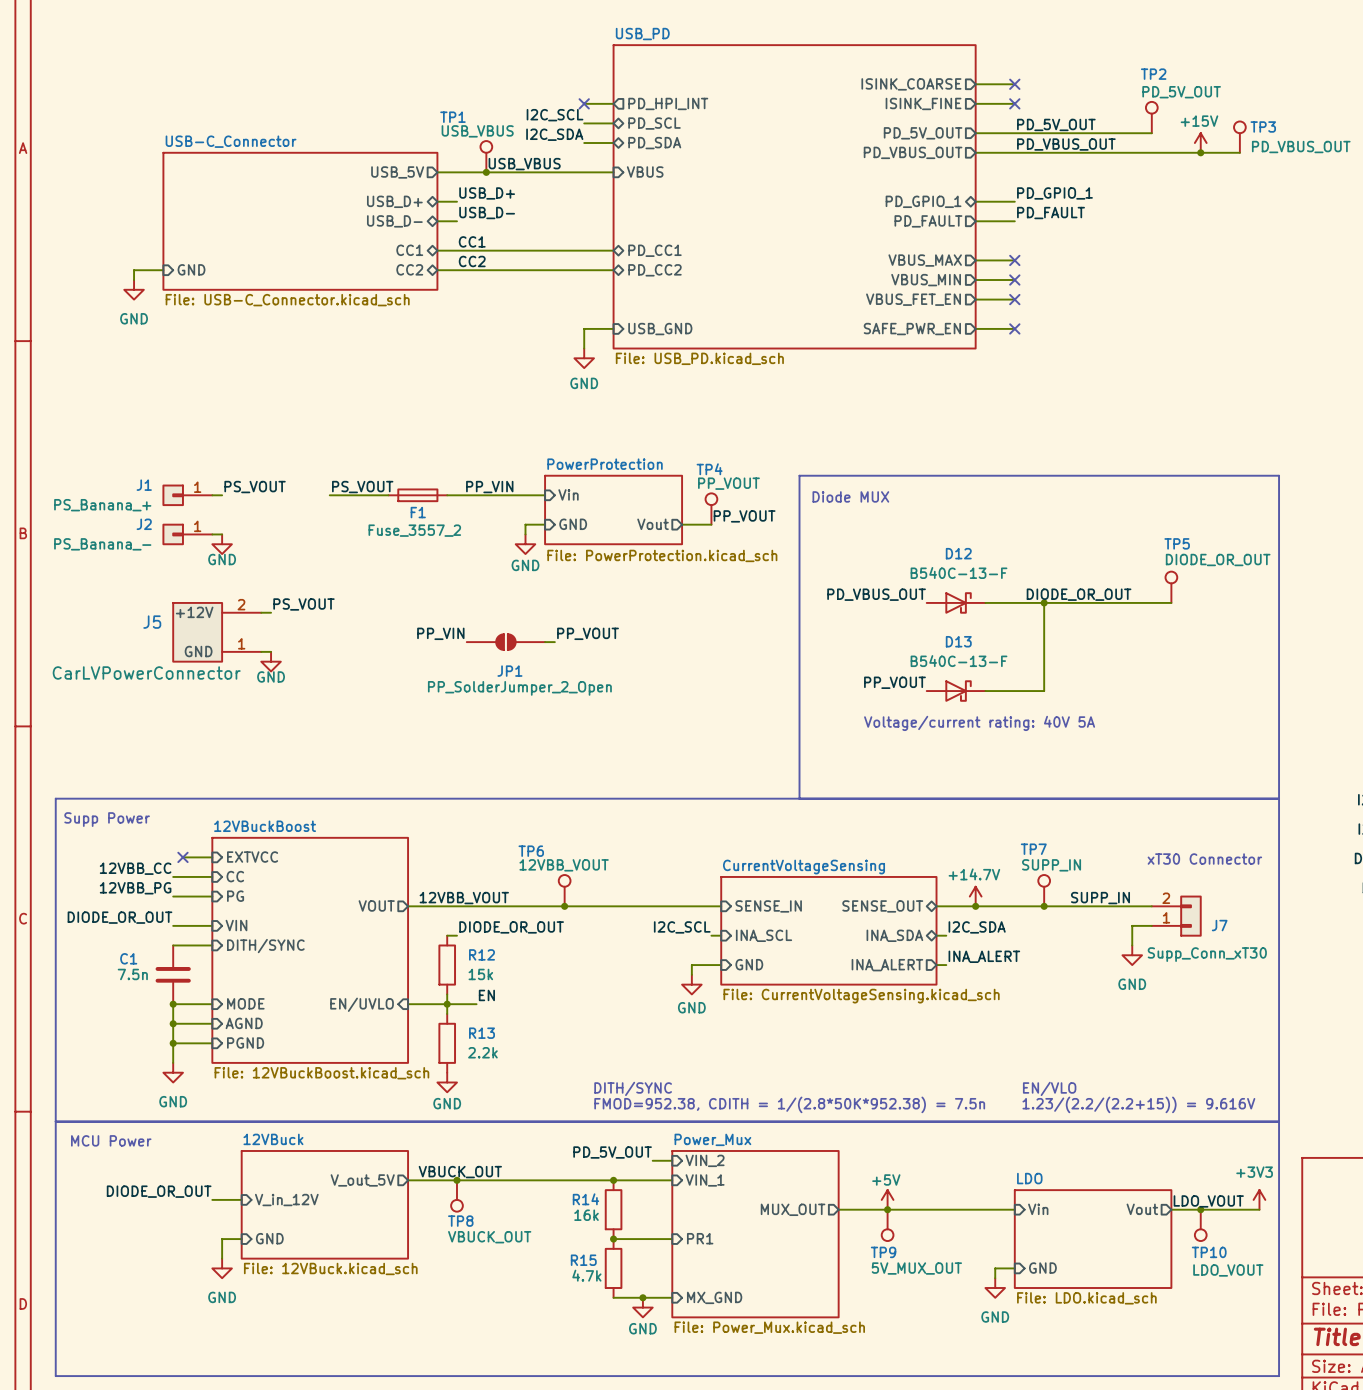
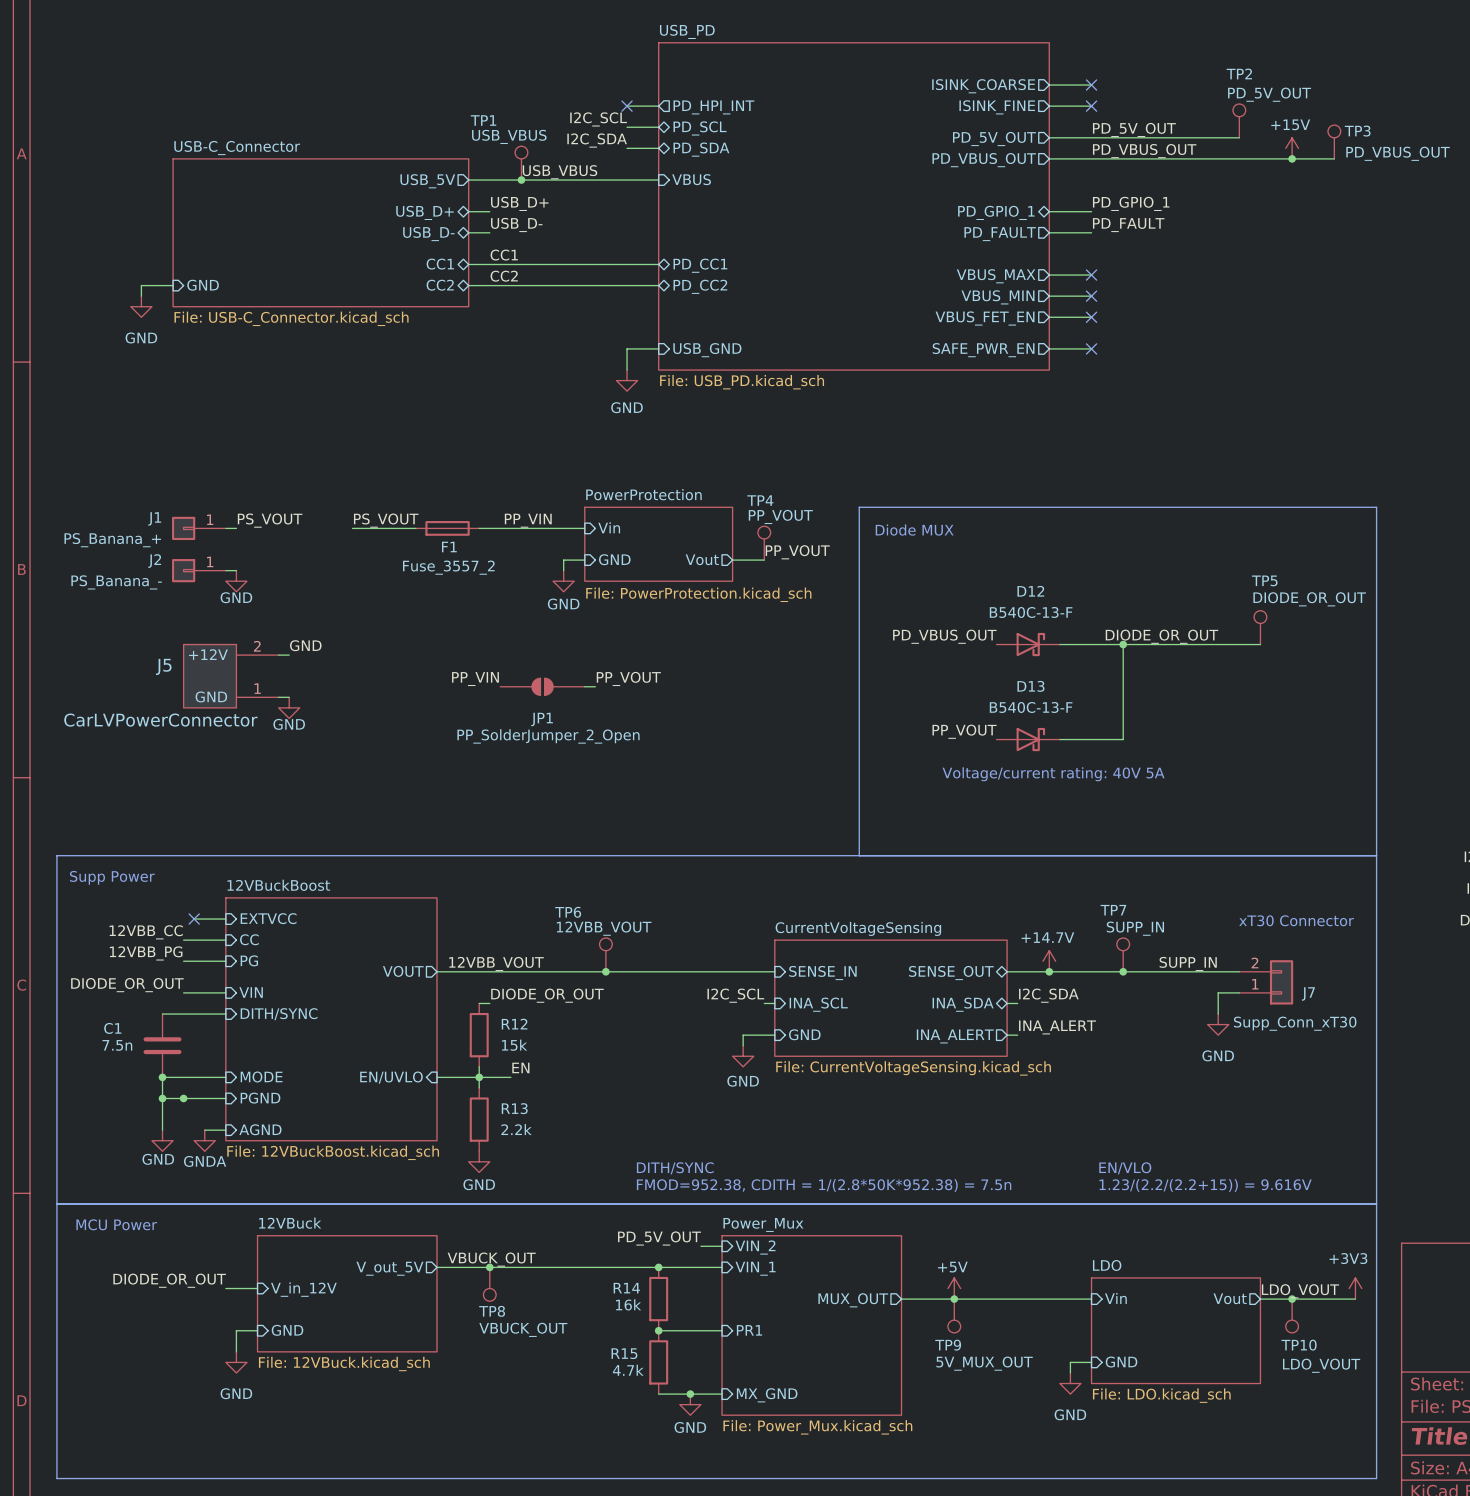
label: PS_VOUT (303, 604) -> GND (305, 645)
wire: none -> (162, 1014) (183, 1014)
C1 position: (173, 974) -> (162, 1045)
junction: none -> (162, 1077)
wire: (173, 1004) (173, 1062) -> (183, 1077) (162, 1077) (162, 1130)
junction: (173, 1004) -> none
wire: none -> (162, 1098) (183, 1098)
junction: none -> (162, 1098)
sheet pin: AGND (244, 1023) -> PGND (260, 1098)
sheet pin: PGND (245, 1042) -> AGND (260, 1129)
wire: (173, 1043) (212, 1043) -> none
junction: (173, 1043) -> none
wire: none -> (204, 1130) (225, 1130)
power symbol: none -> GNDA (204, 1140)
power symbol position: GND (173, 1072) -> GND (162, 1140)
power symbol text position: GND (173, 1101) -> GND (158, 1159)

